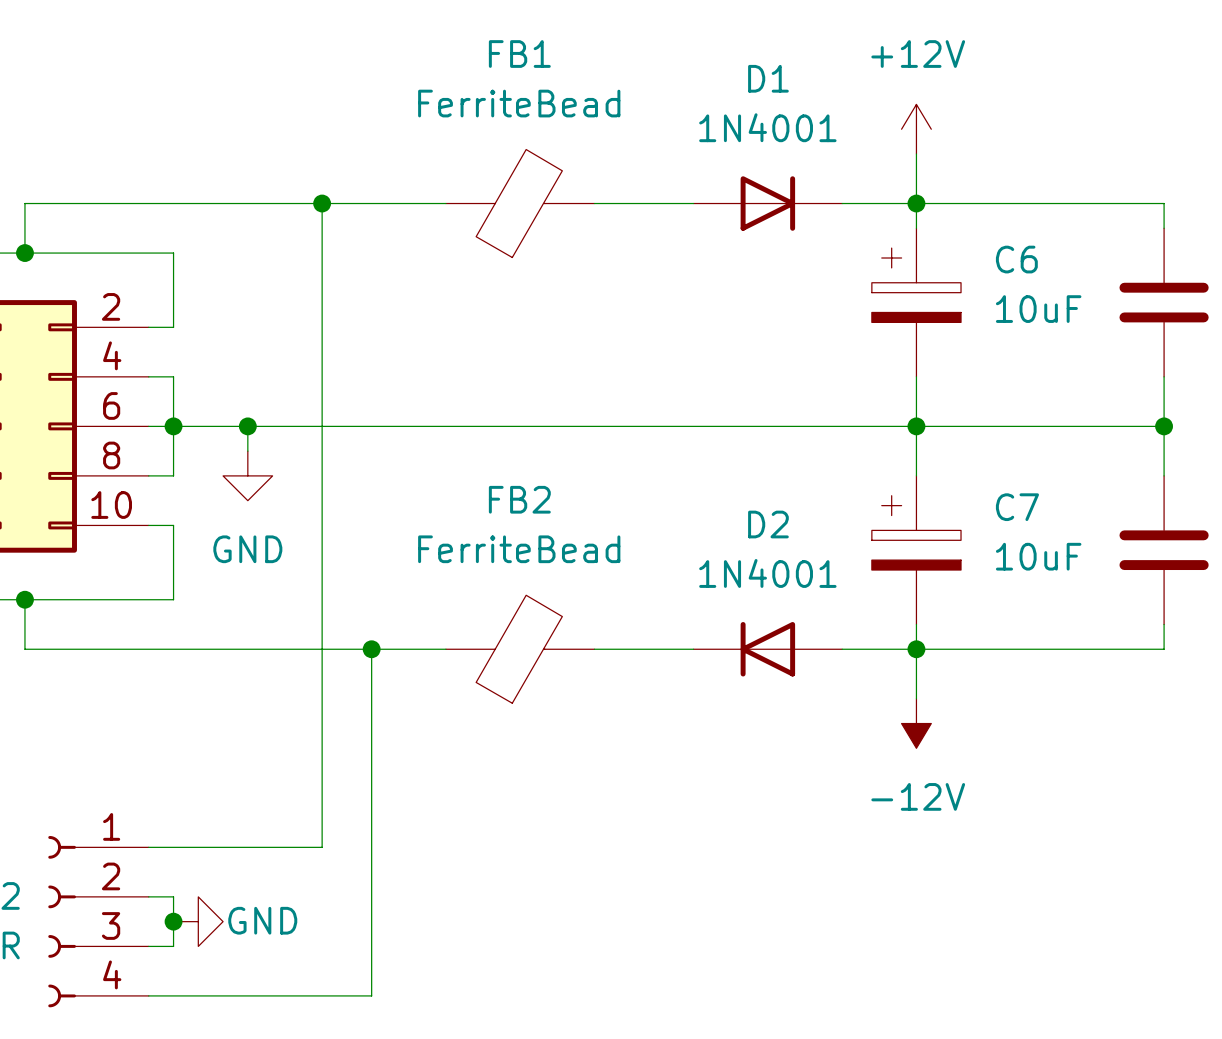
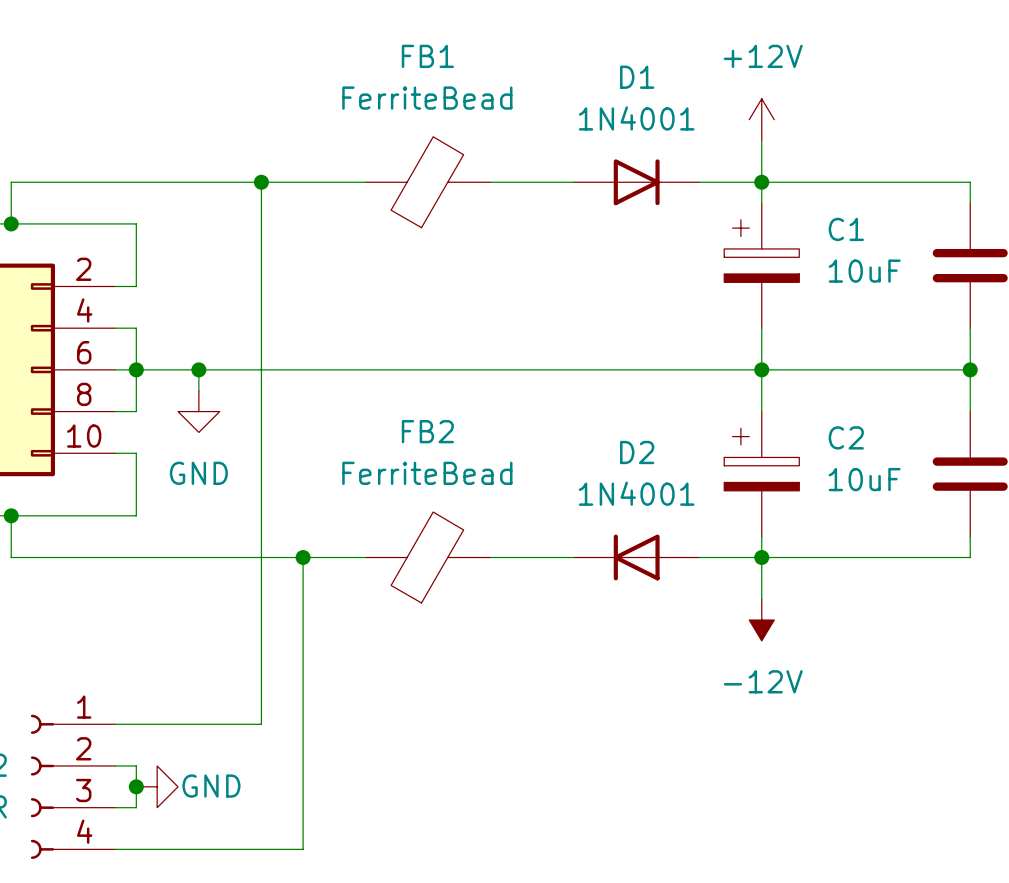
C6 name: C6 (1016, 259) -> C1 (846, 229)
C7 name: C7 (1017, 507) -> C2 (846, 437)

